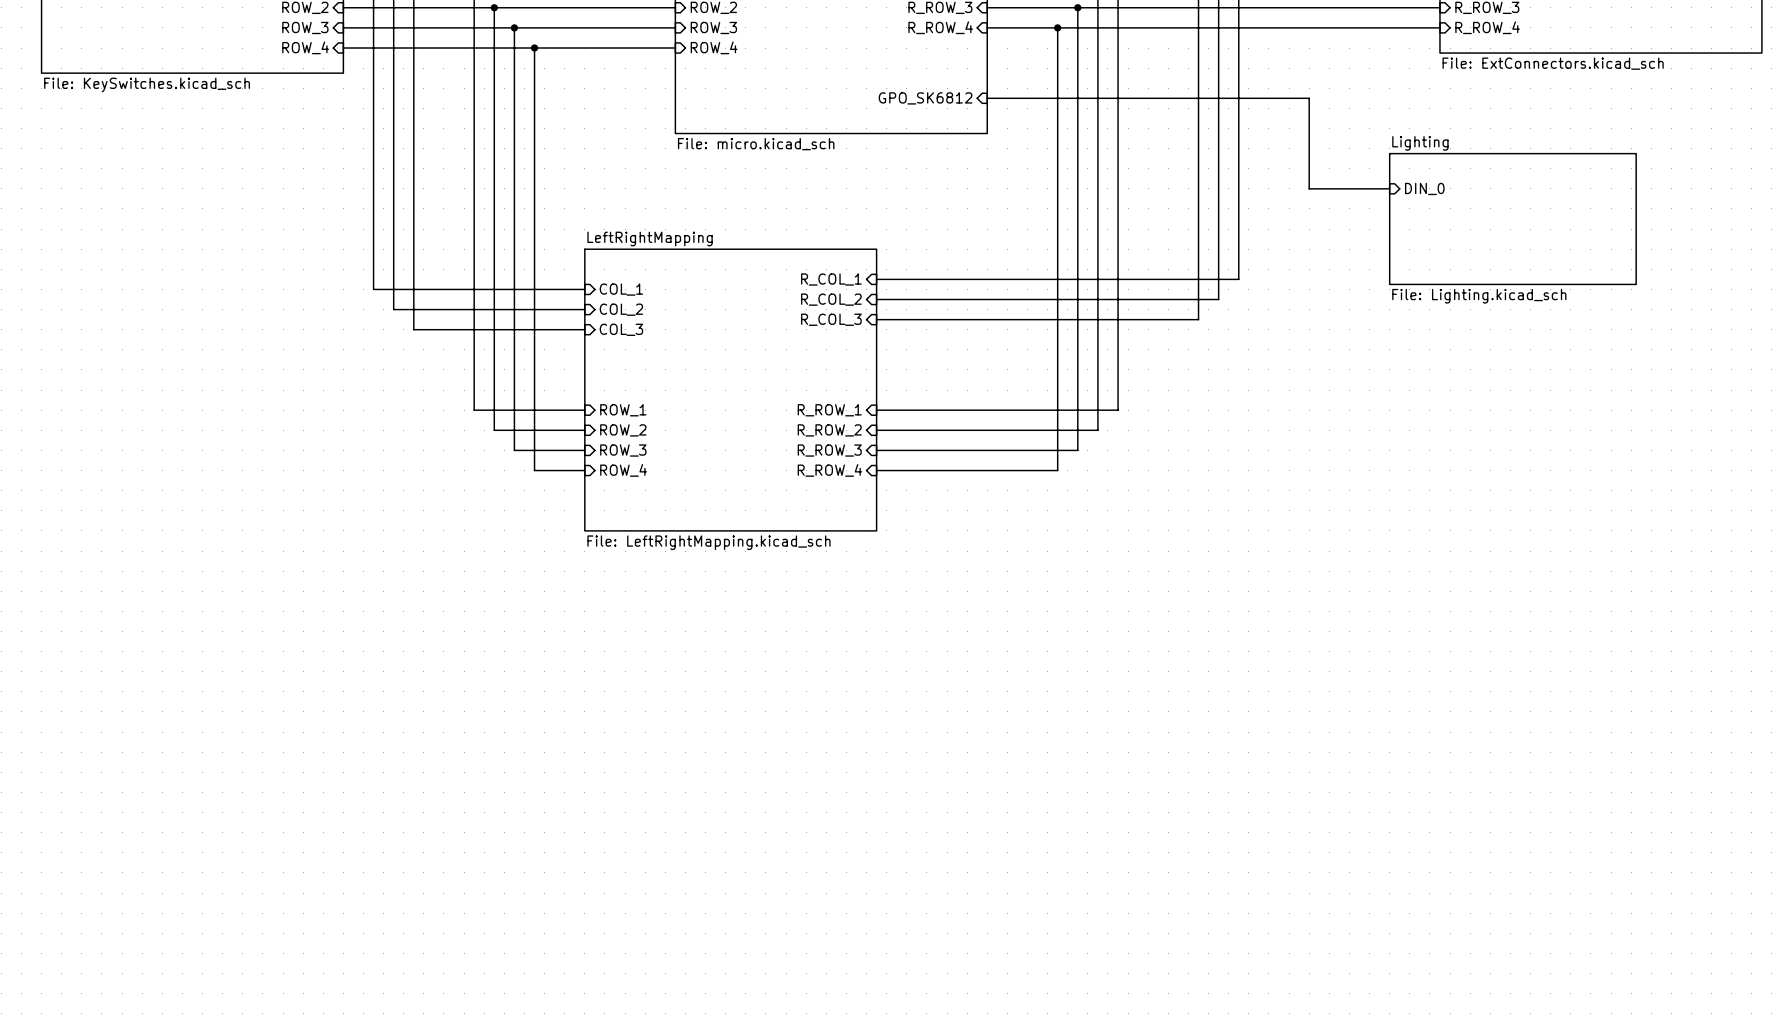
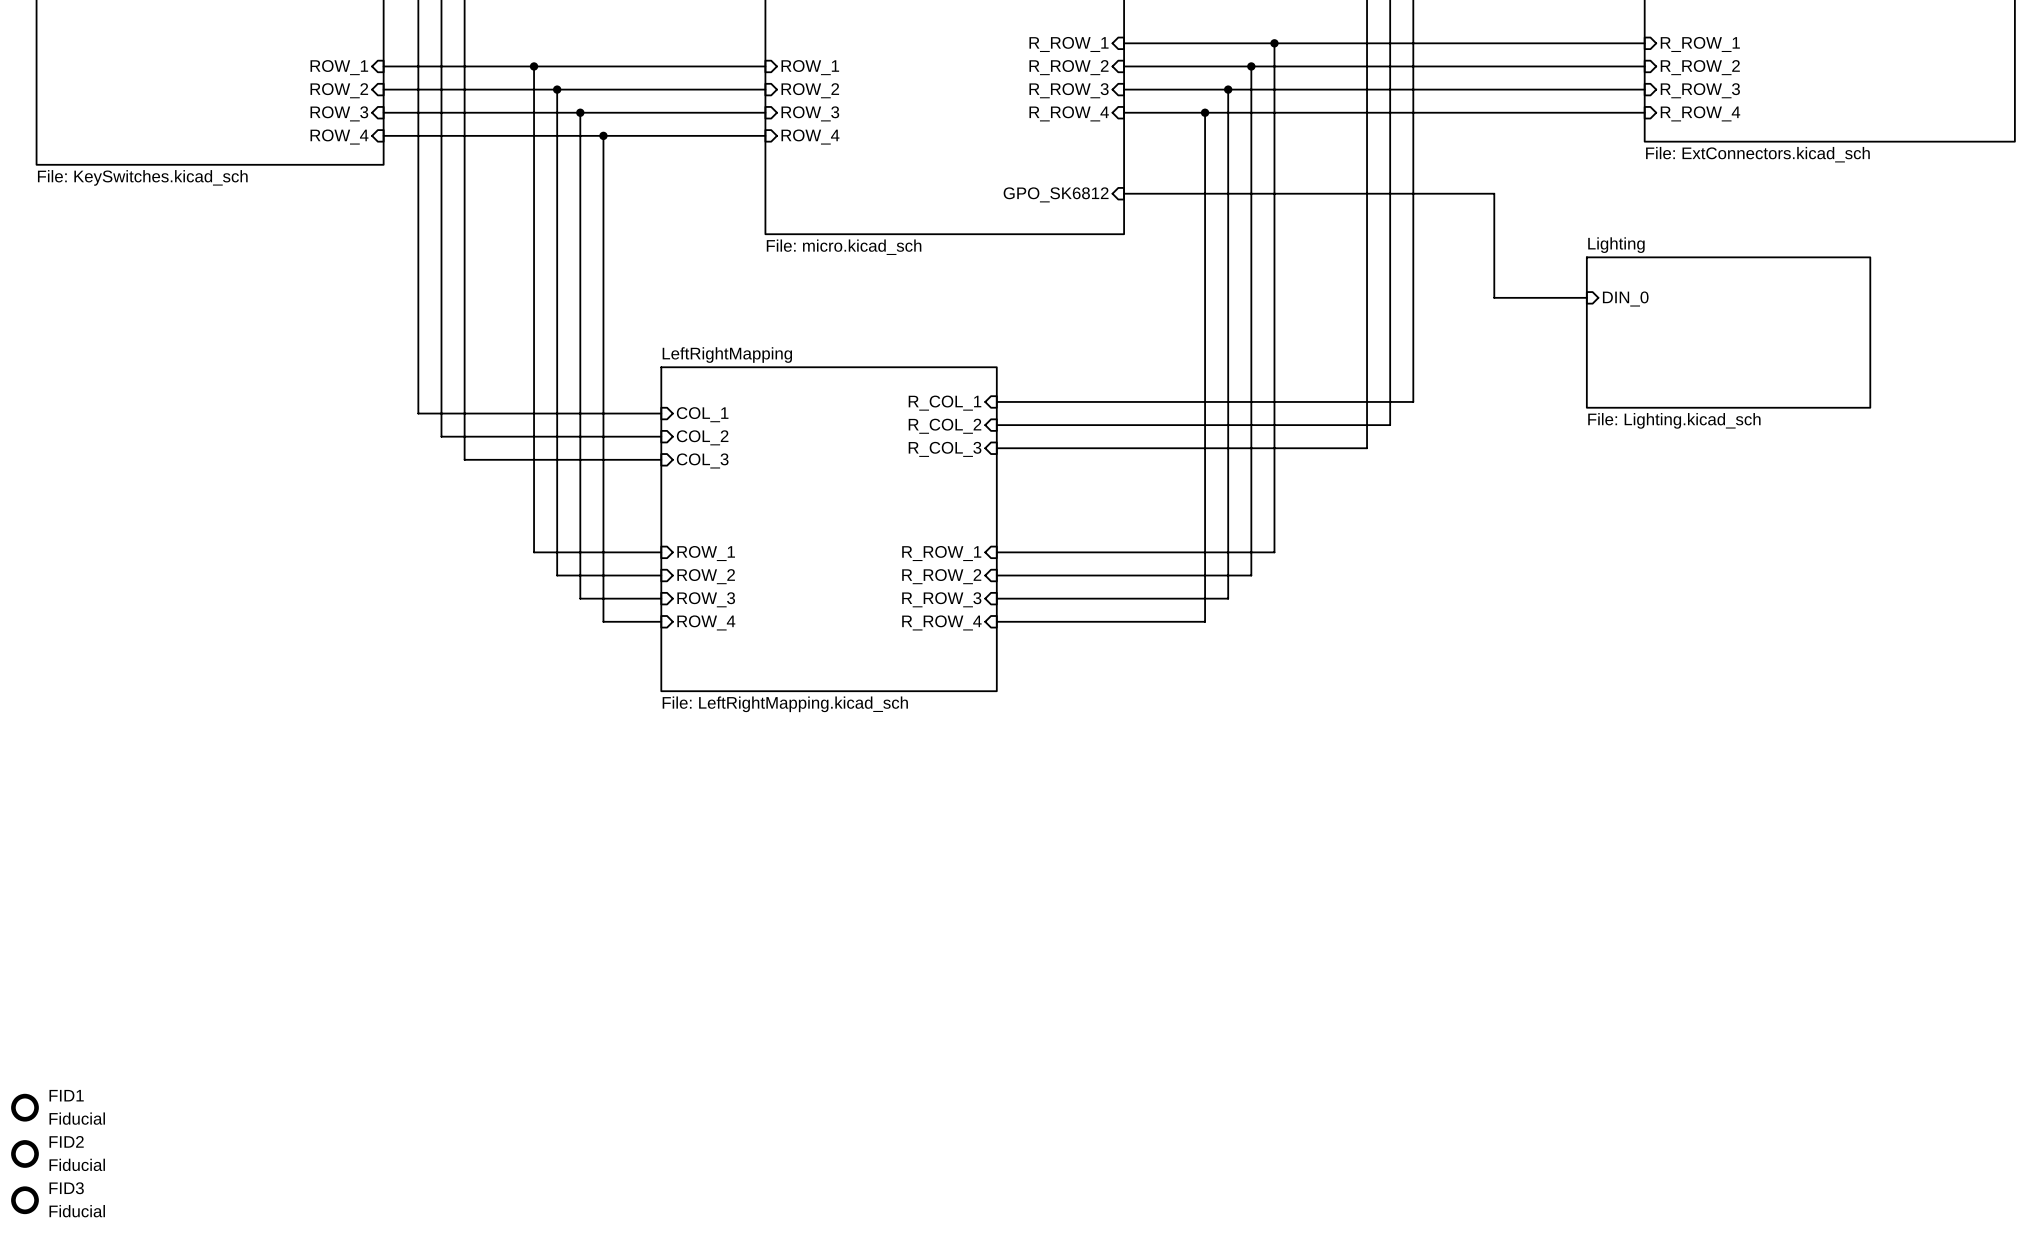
FID1: none -> Fiducial (24, 1107)
FID2: none -> Fiducial (24, 1153)
FID3: none -> Fiducial (24, 1200)

